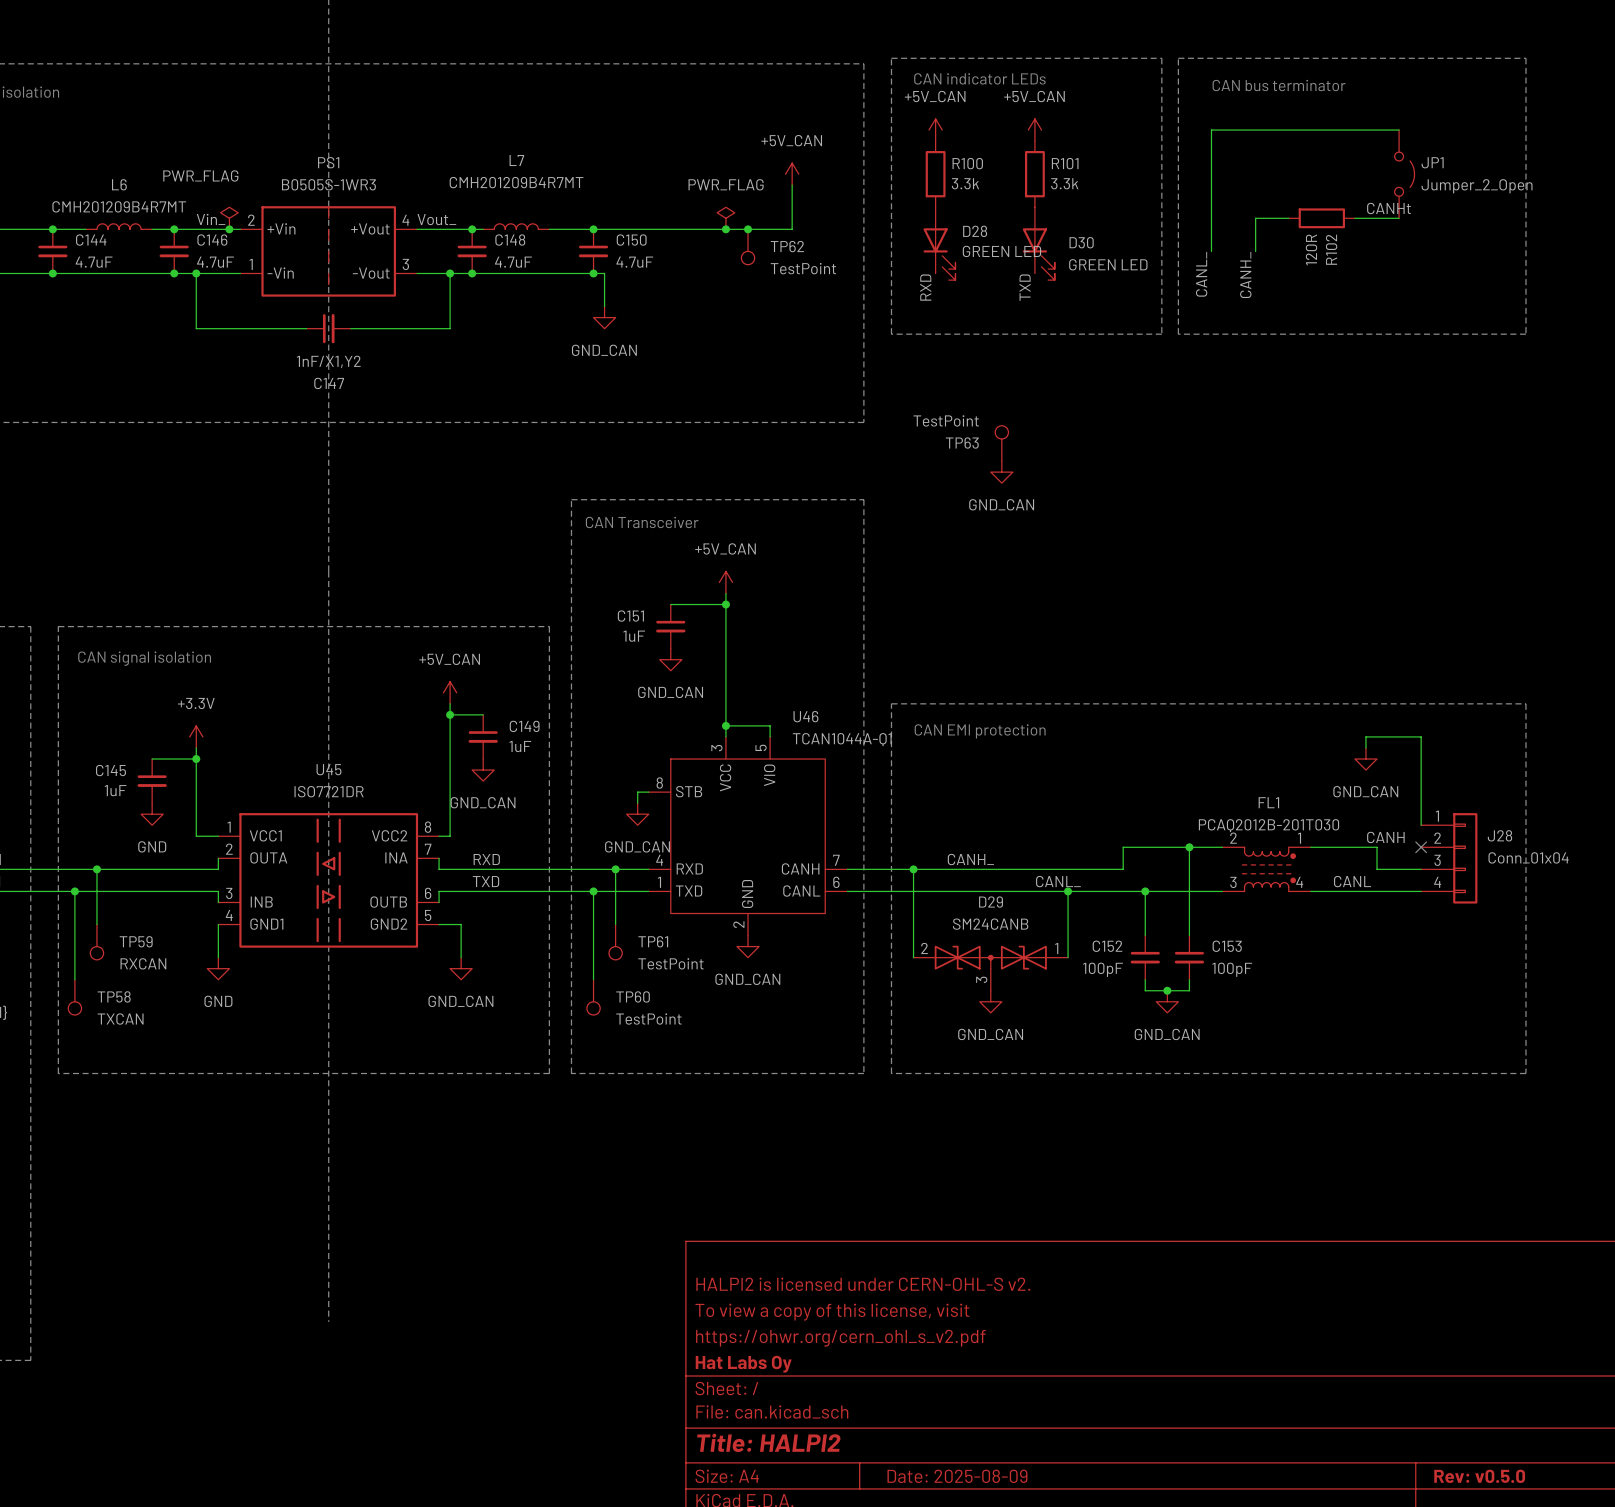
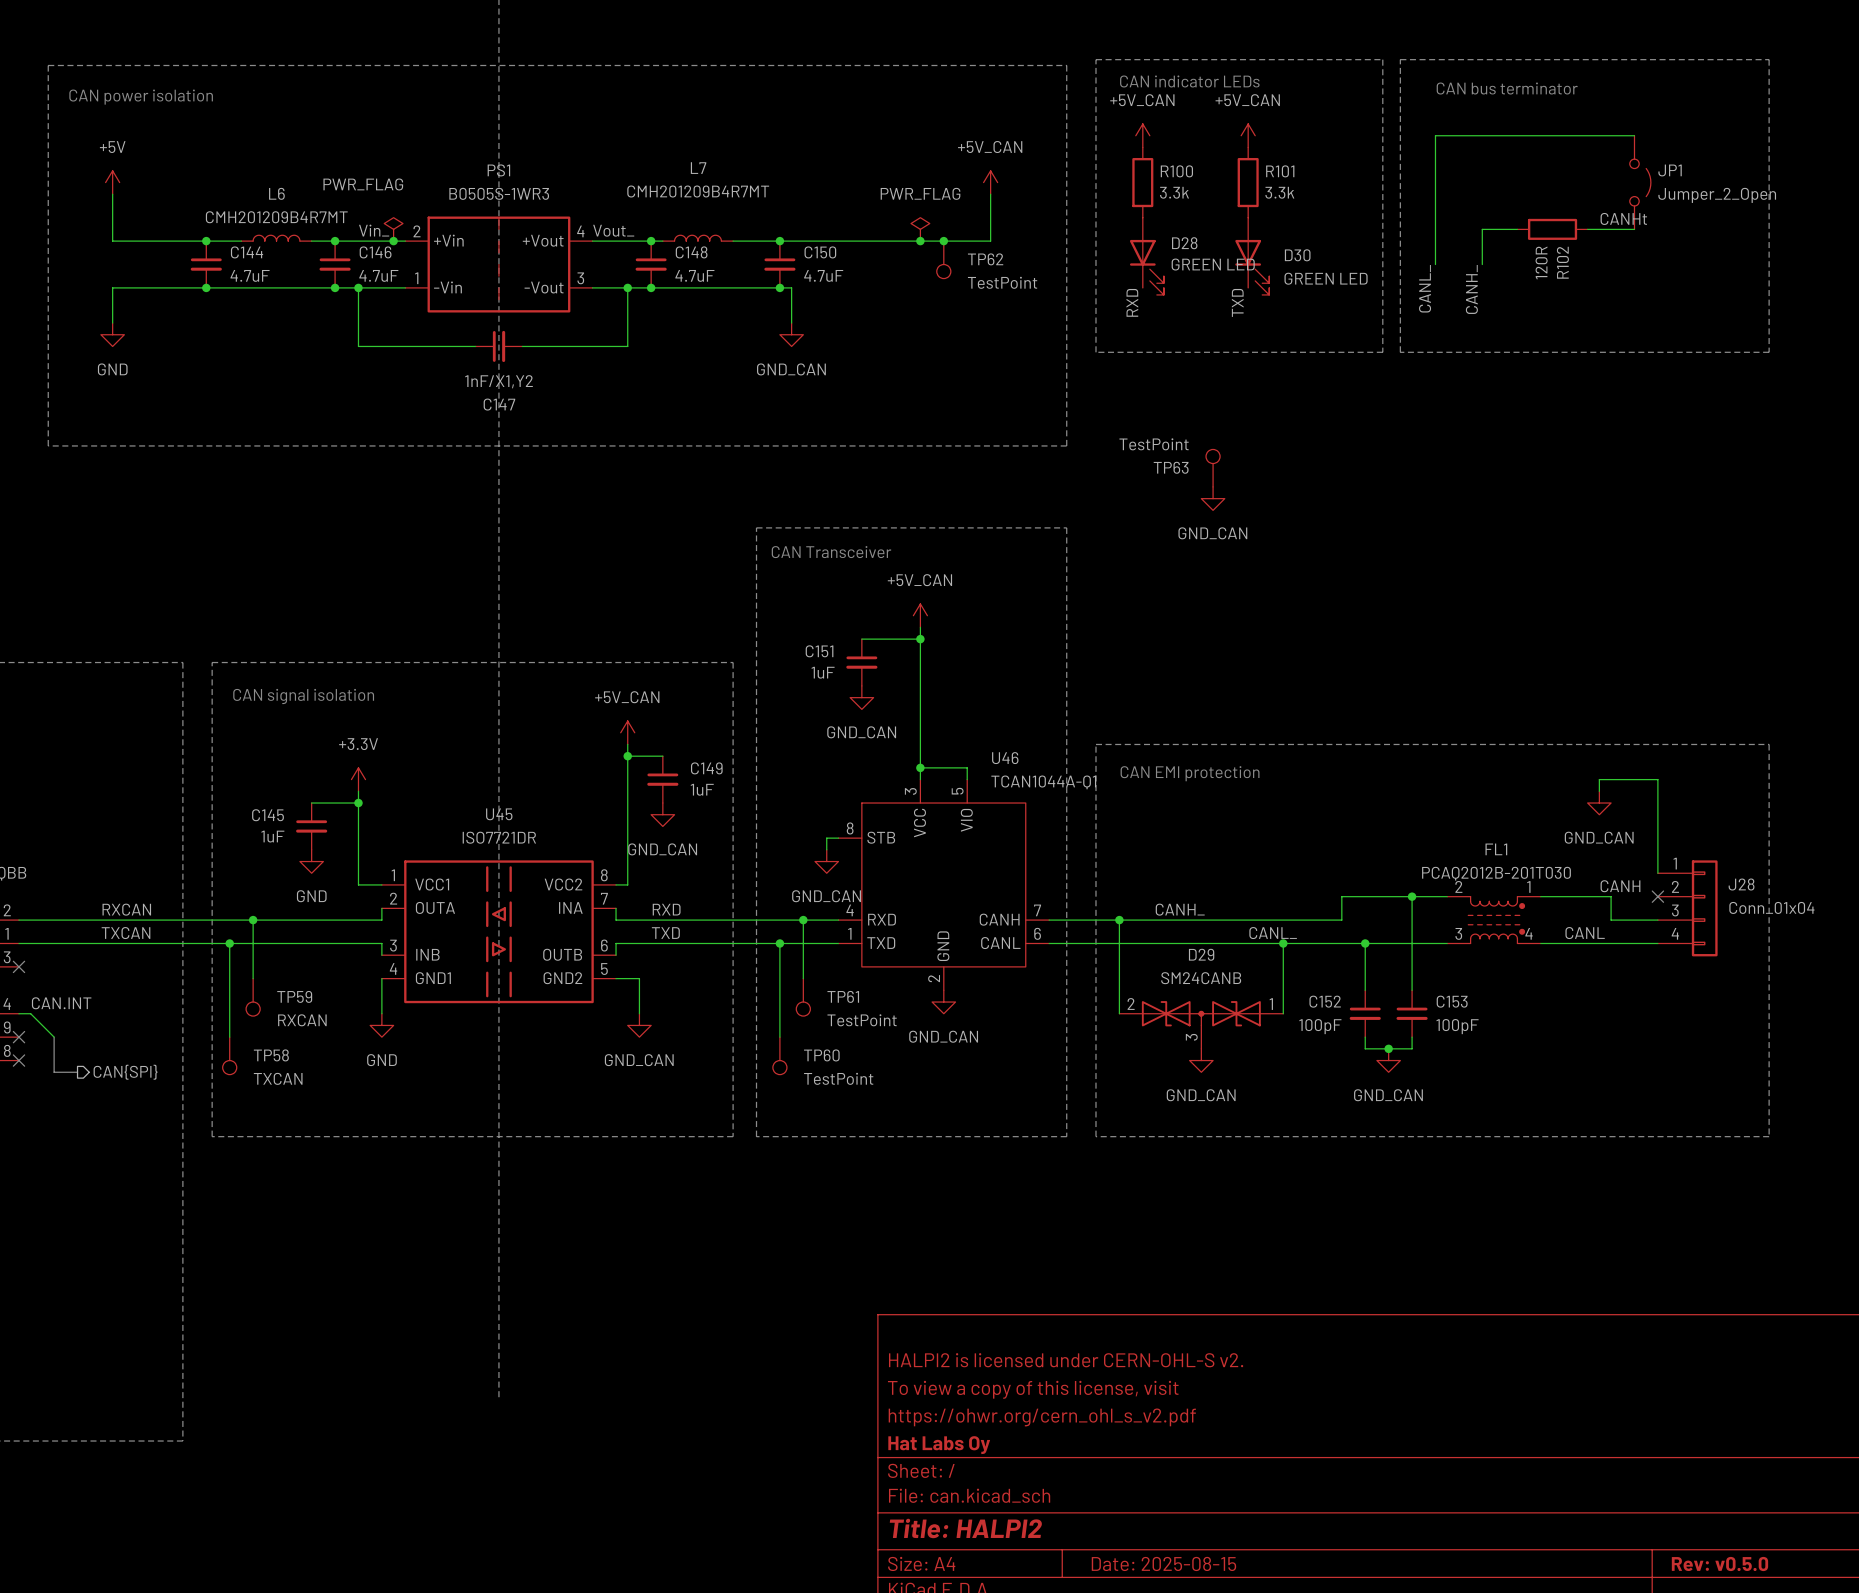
title block: Date: 2025-08-09 (957, 1476) -> Date: 2025-08-15 (1163, 1563)

